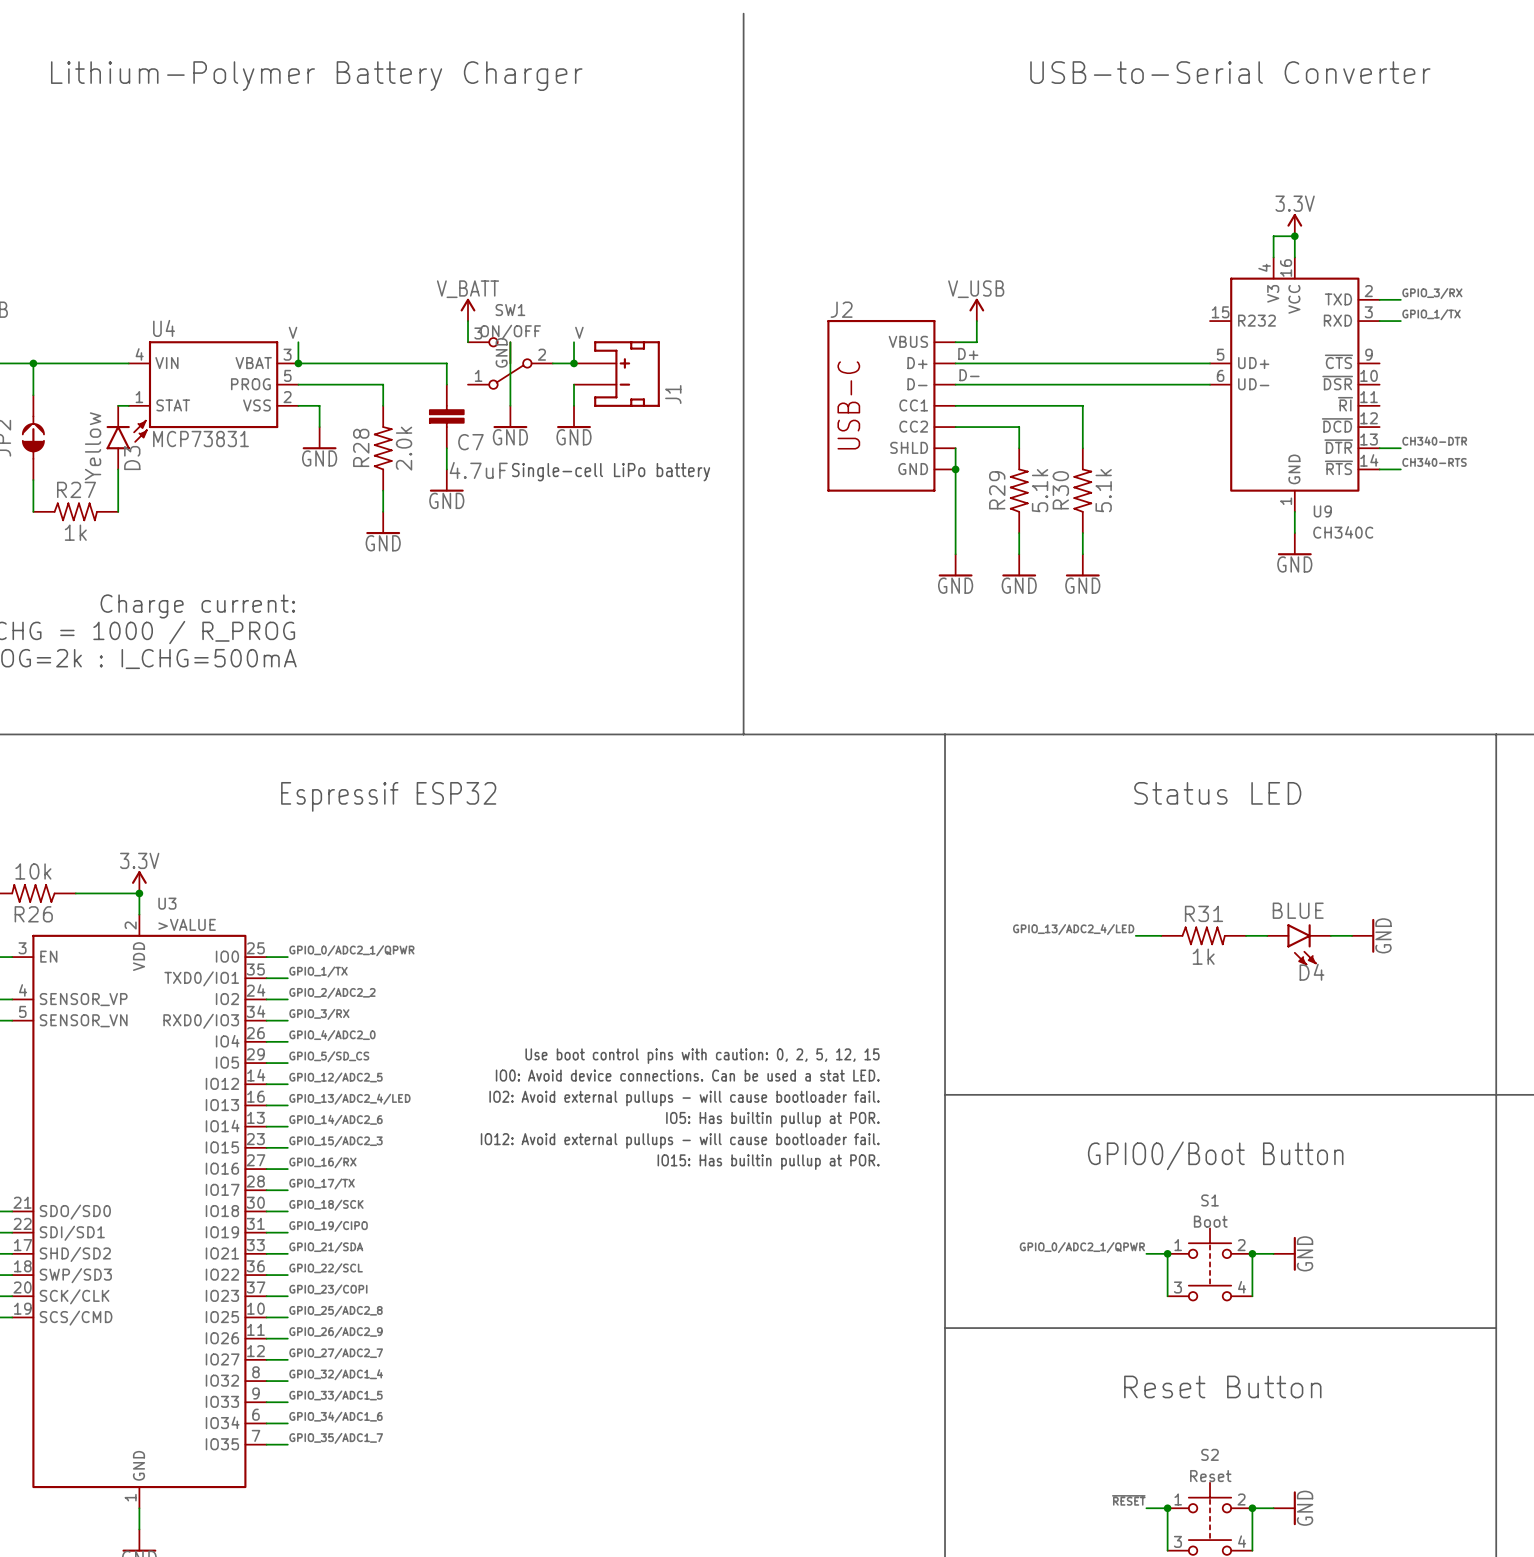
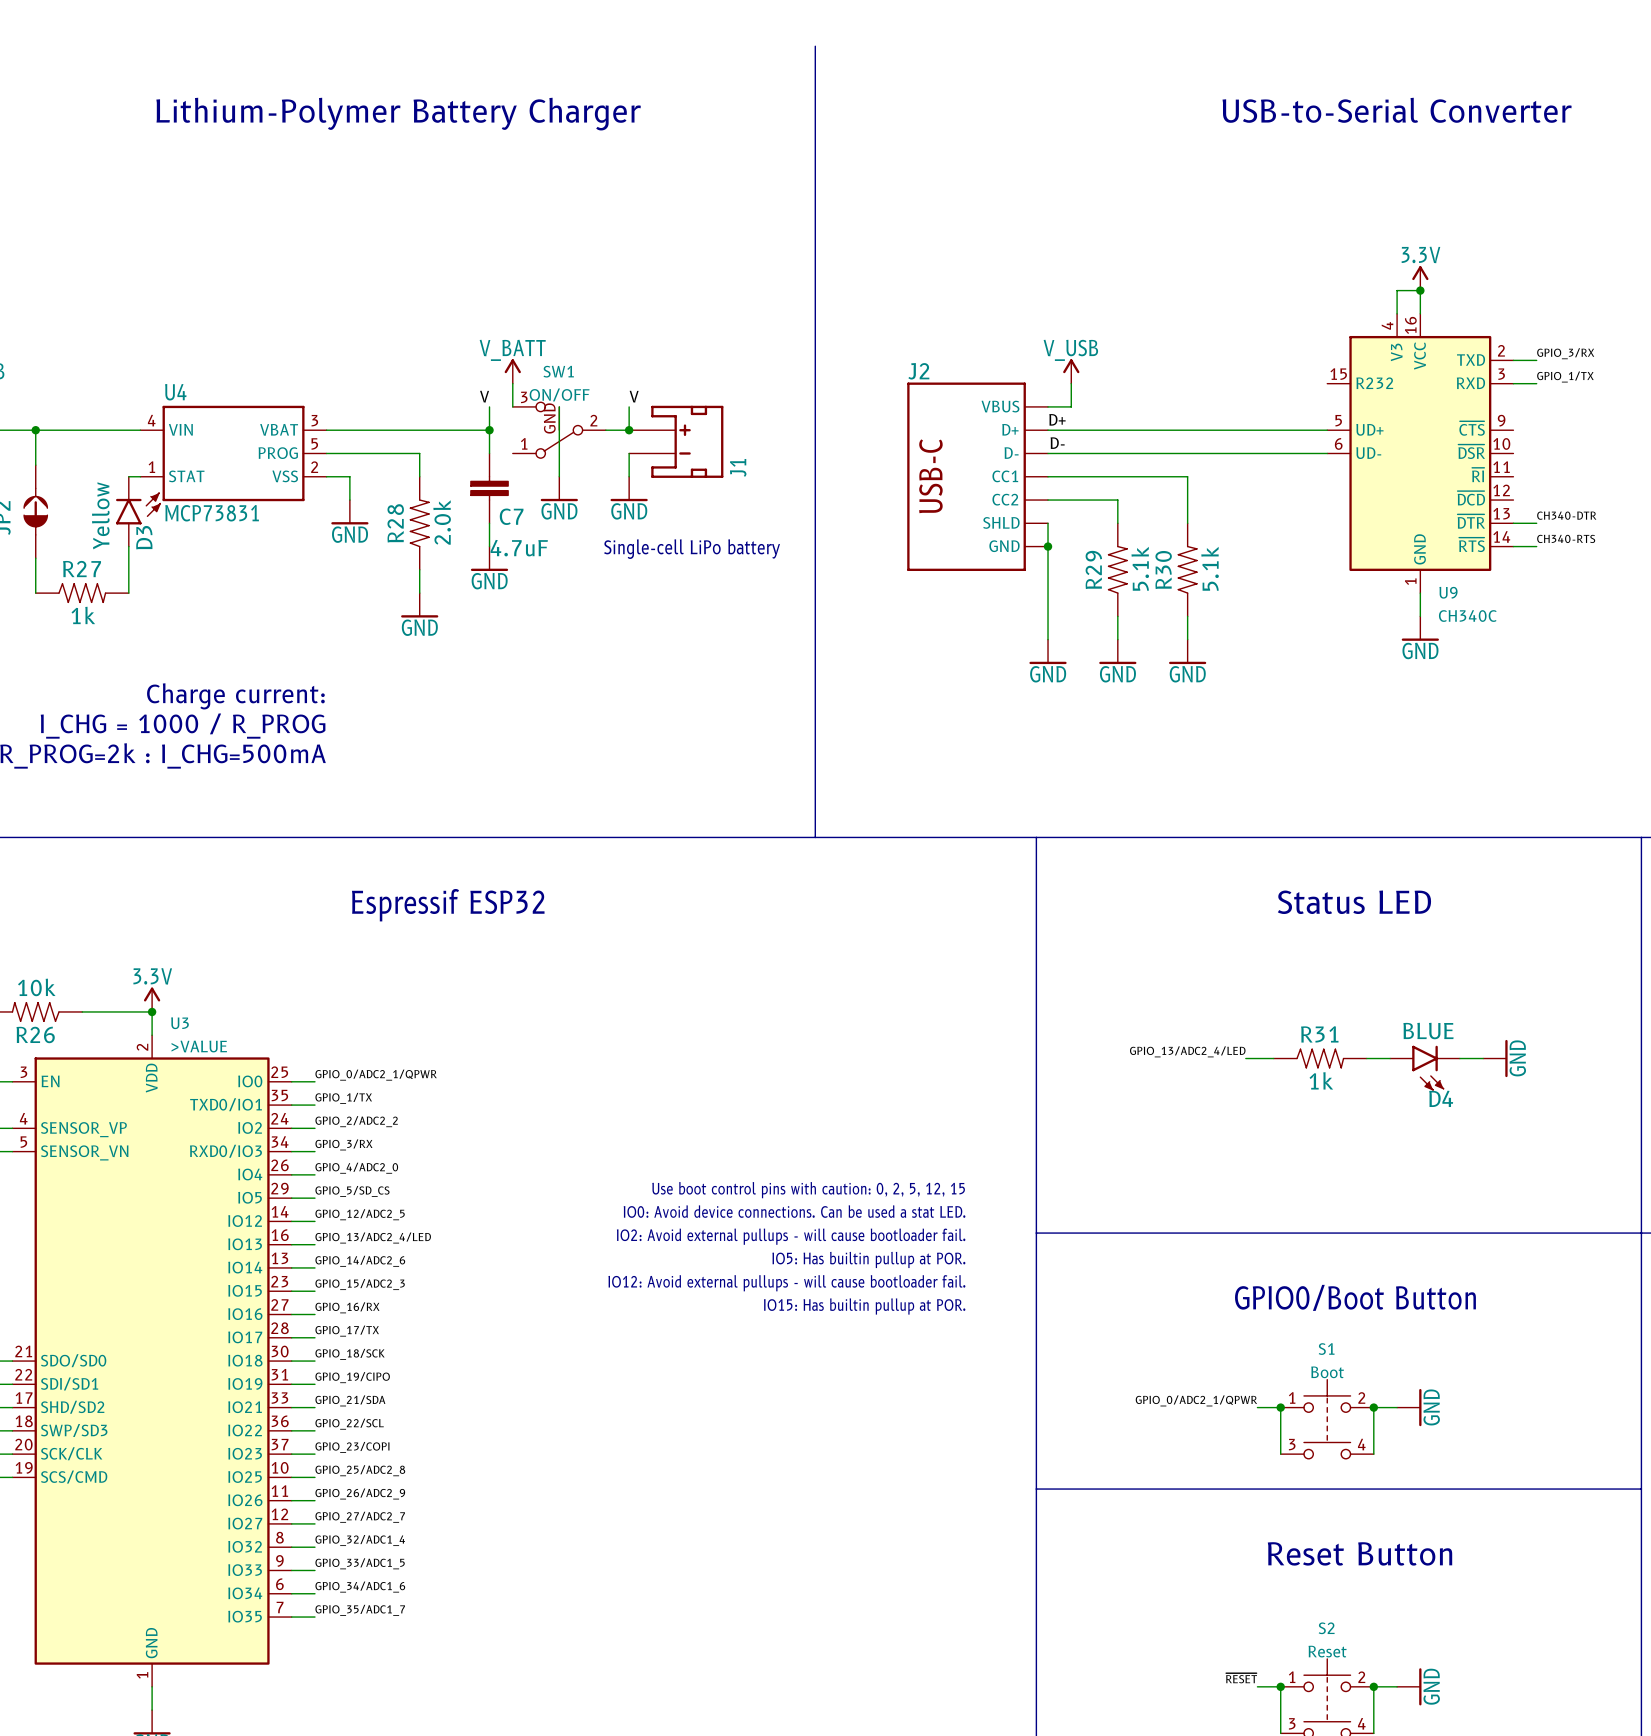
label position: V (293, 332) -> V (484, 396)
wire: (298, 342) (298, 363) -> (489, 406) (489, 430)
junction: (298, 363) -> none
junction: none -> (489, 430)

